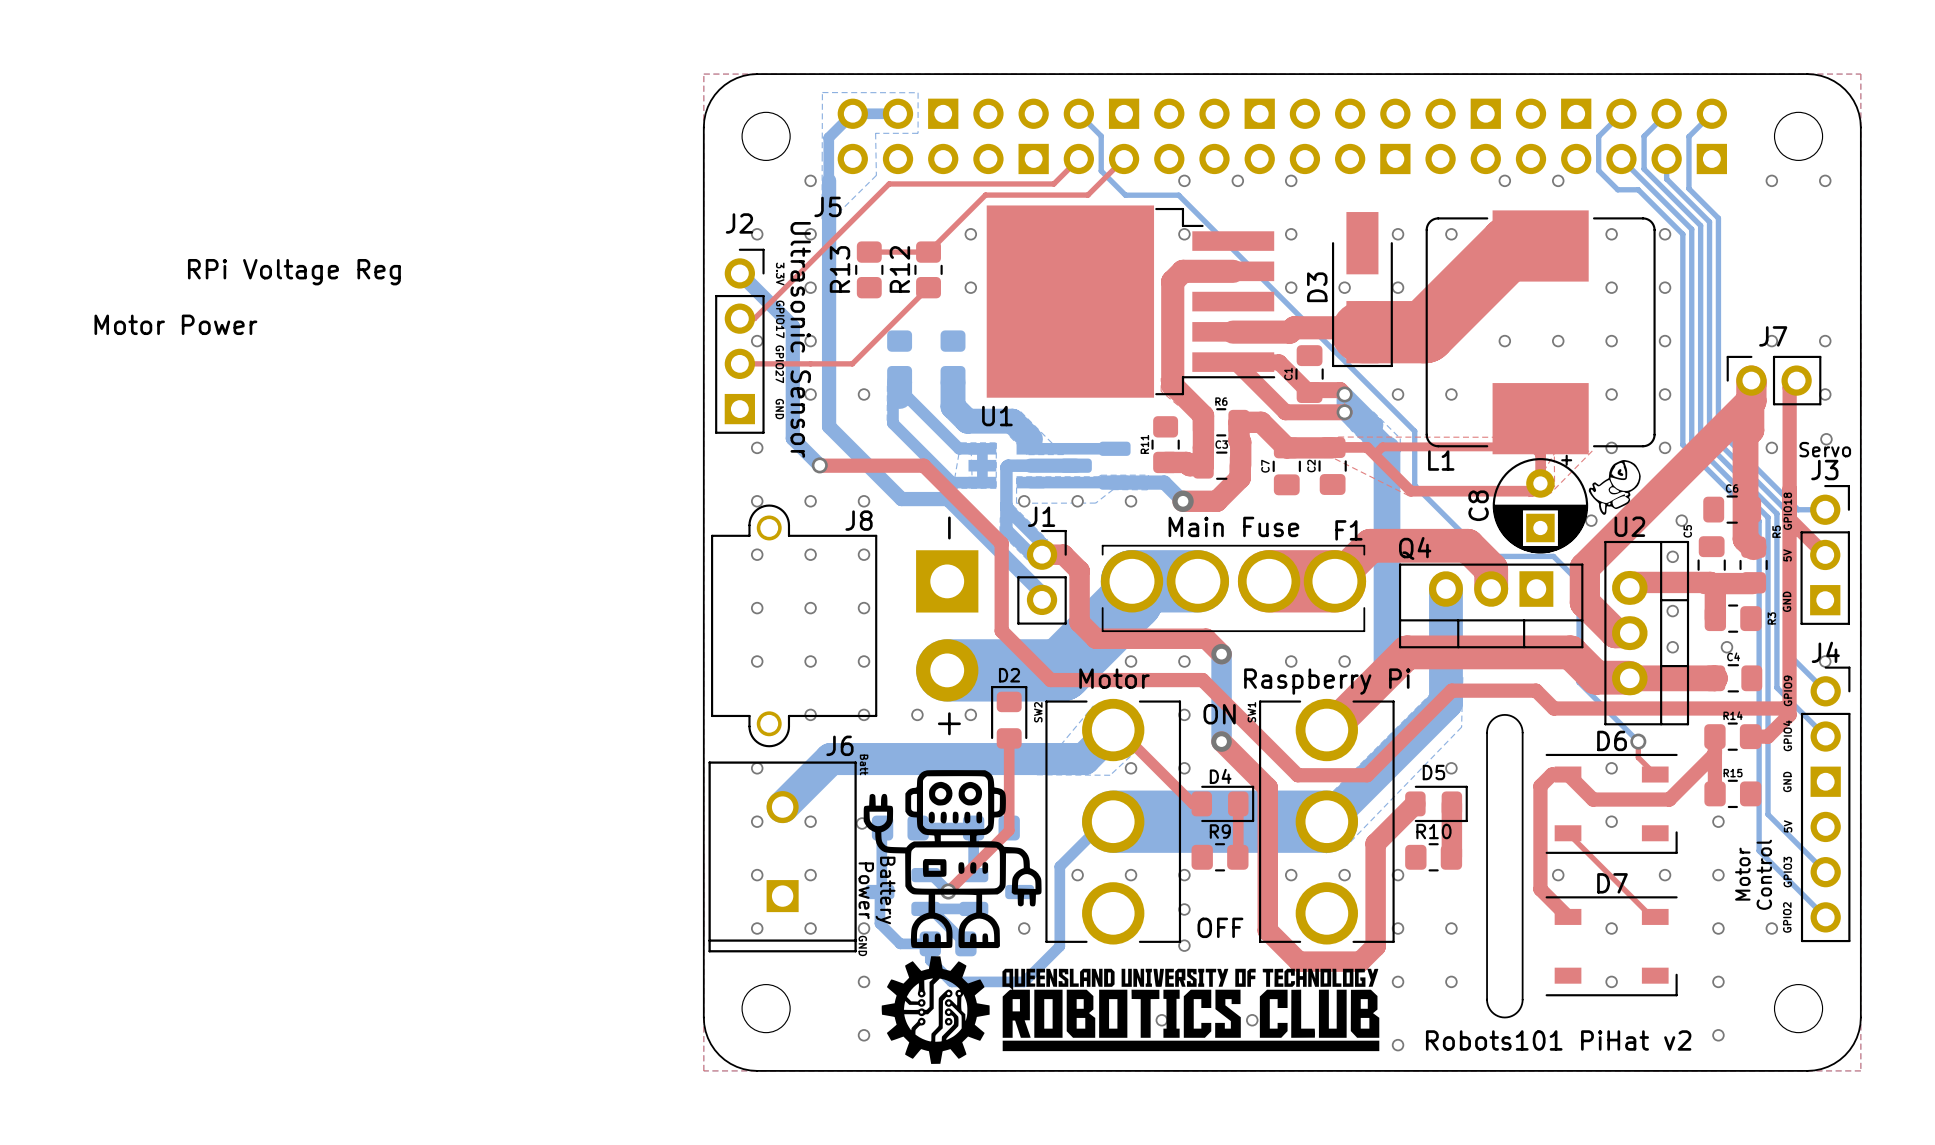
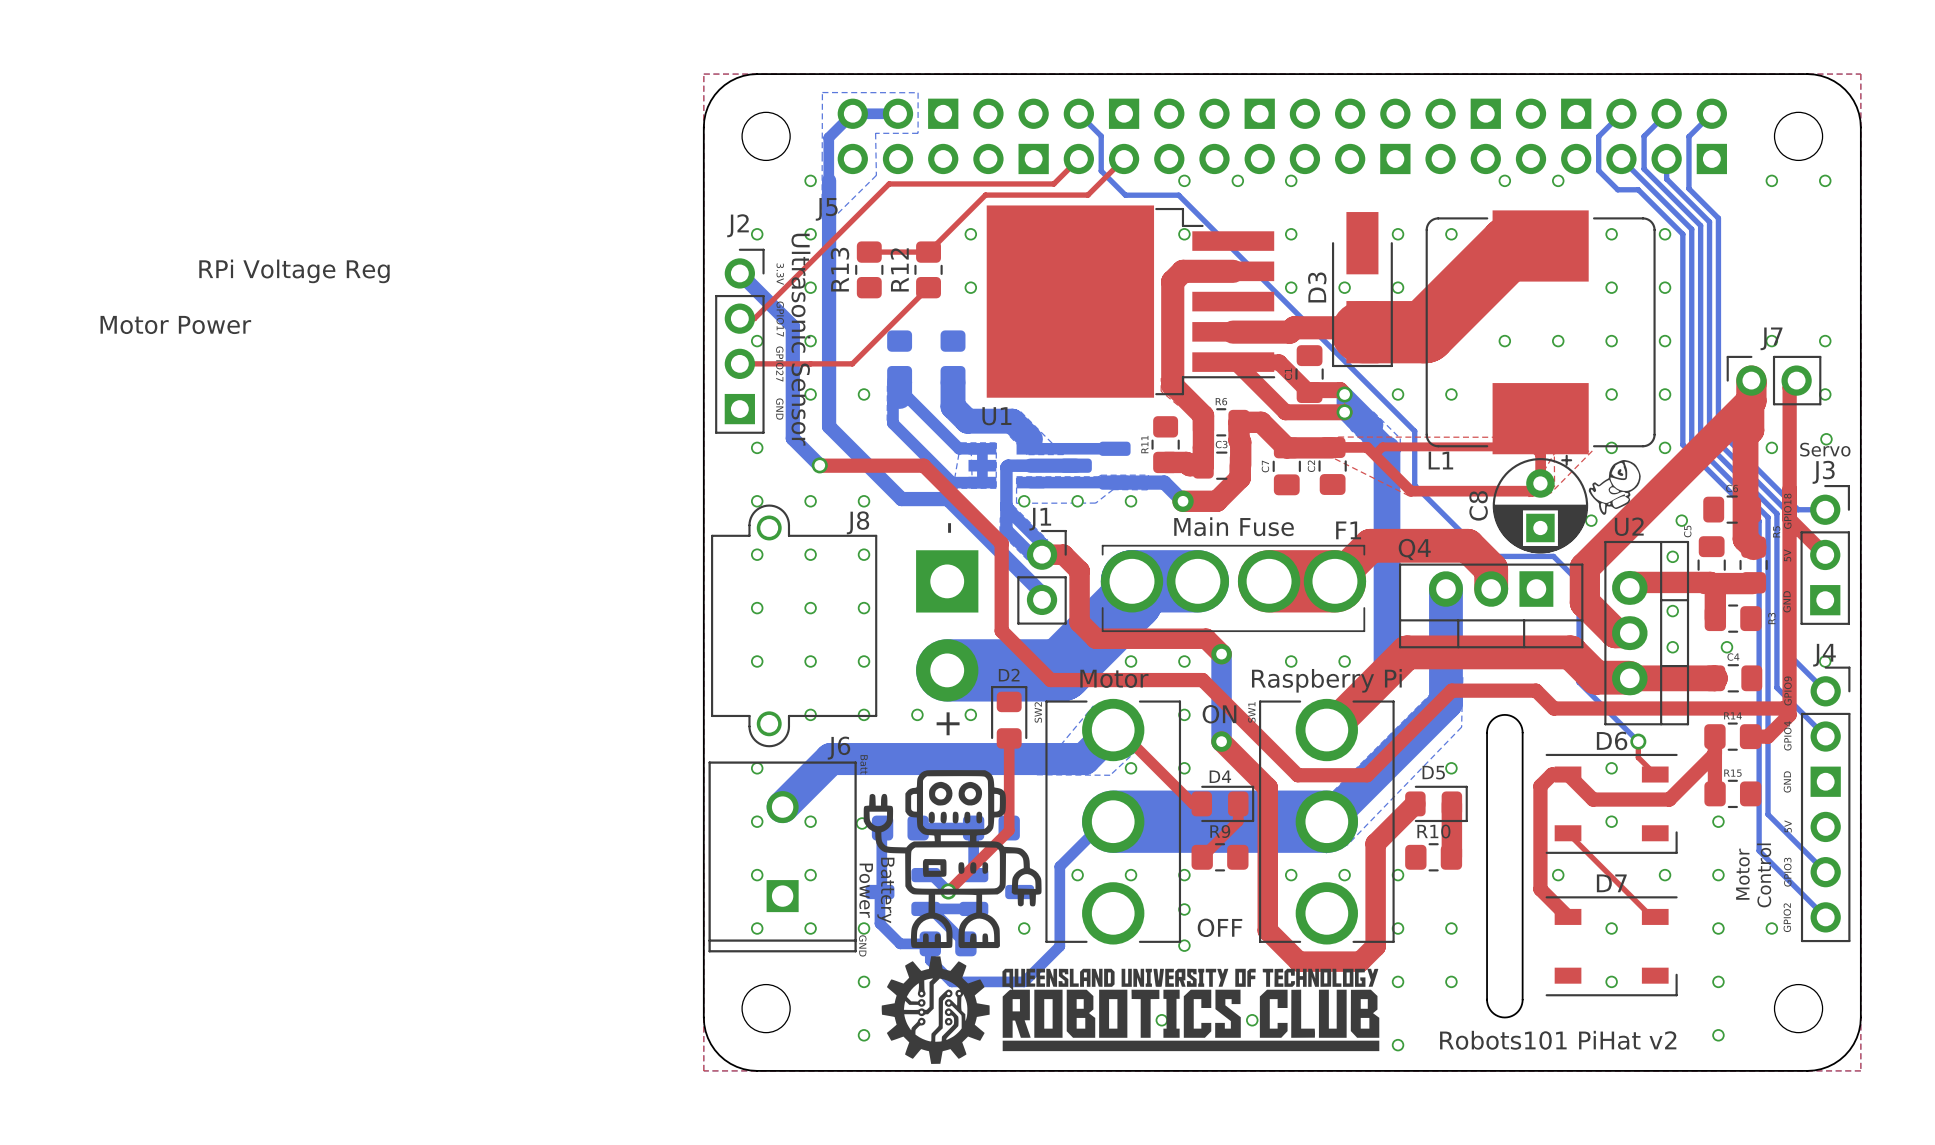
top track: (1238, 821) (1237, 857) -> (1238, 821) (1202, 857)

